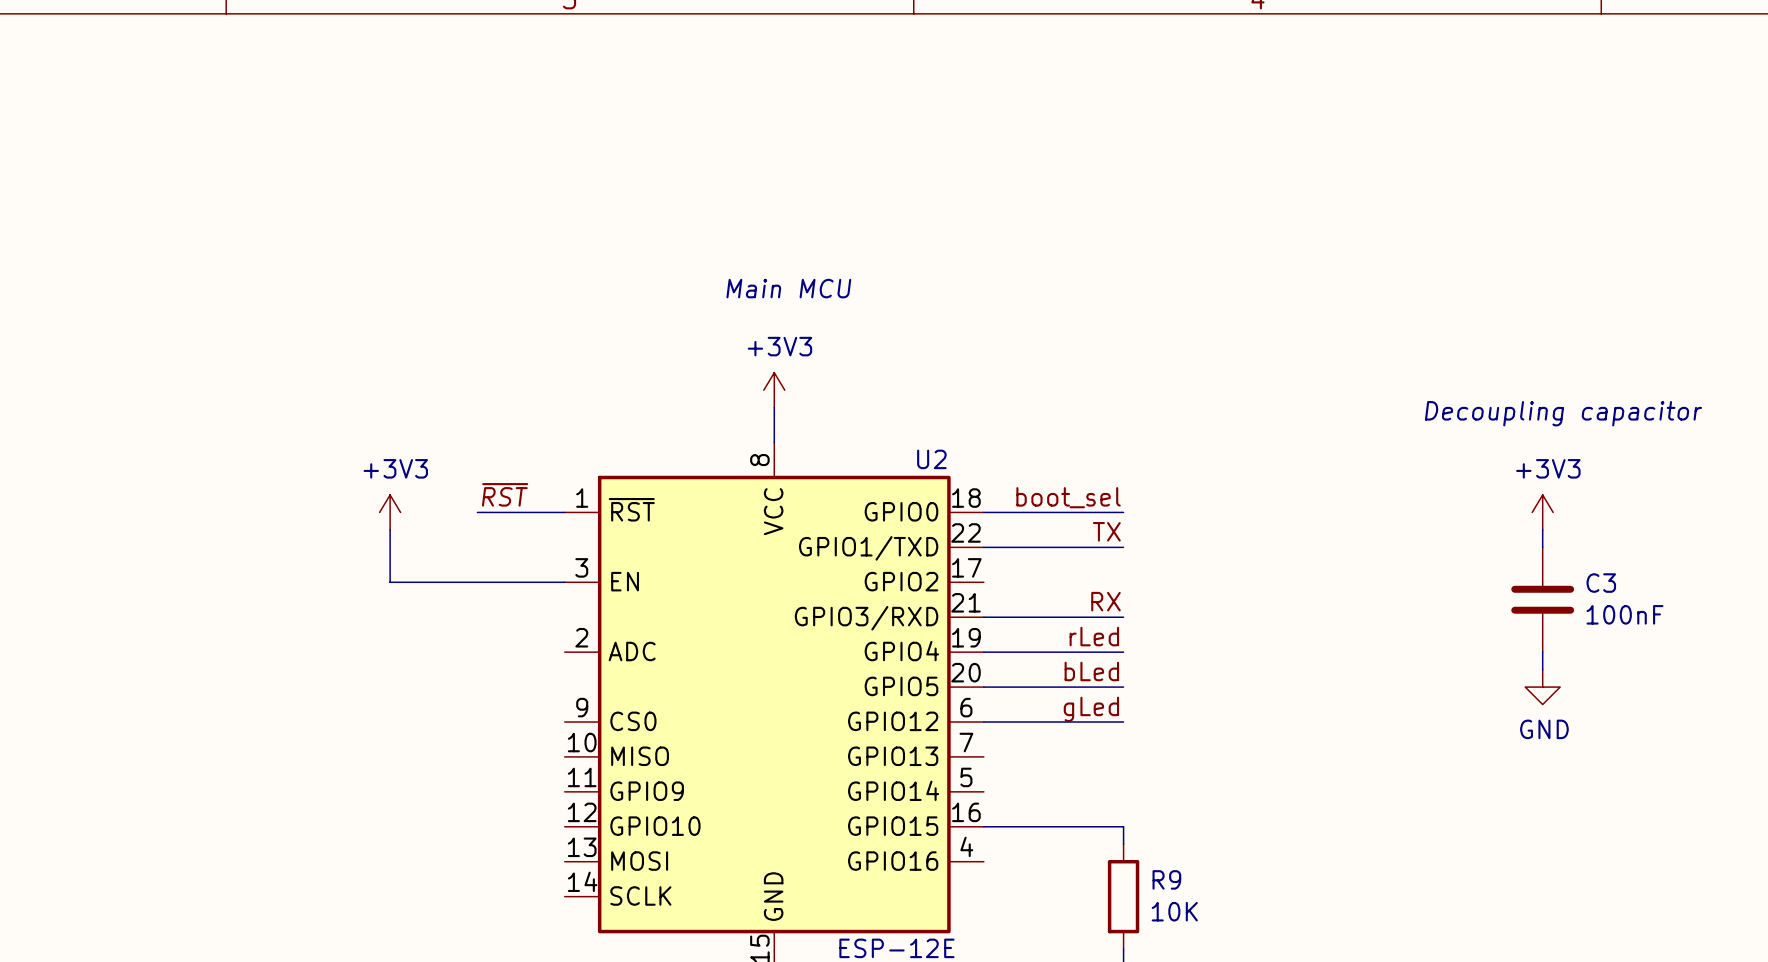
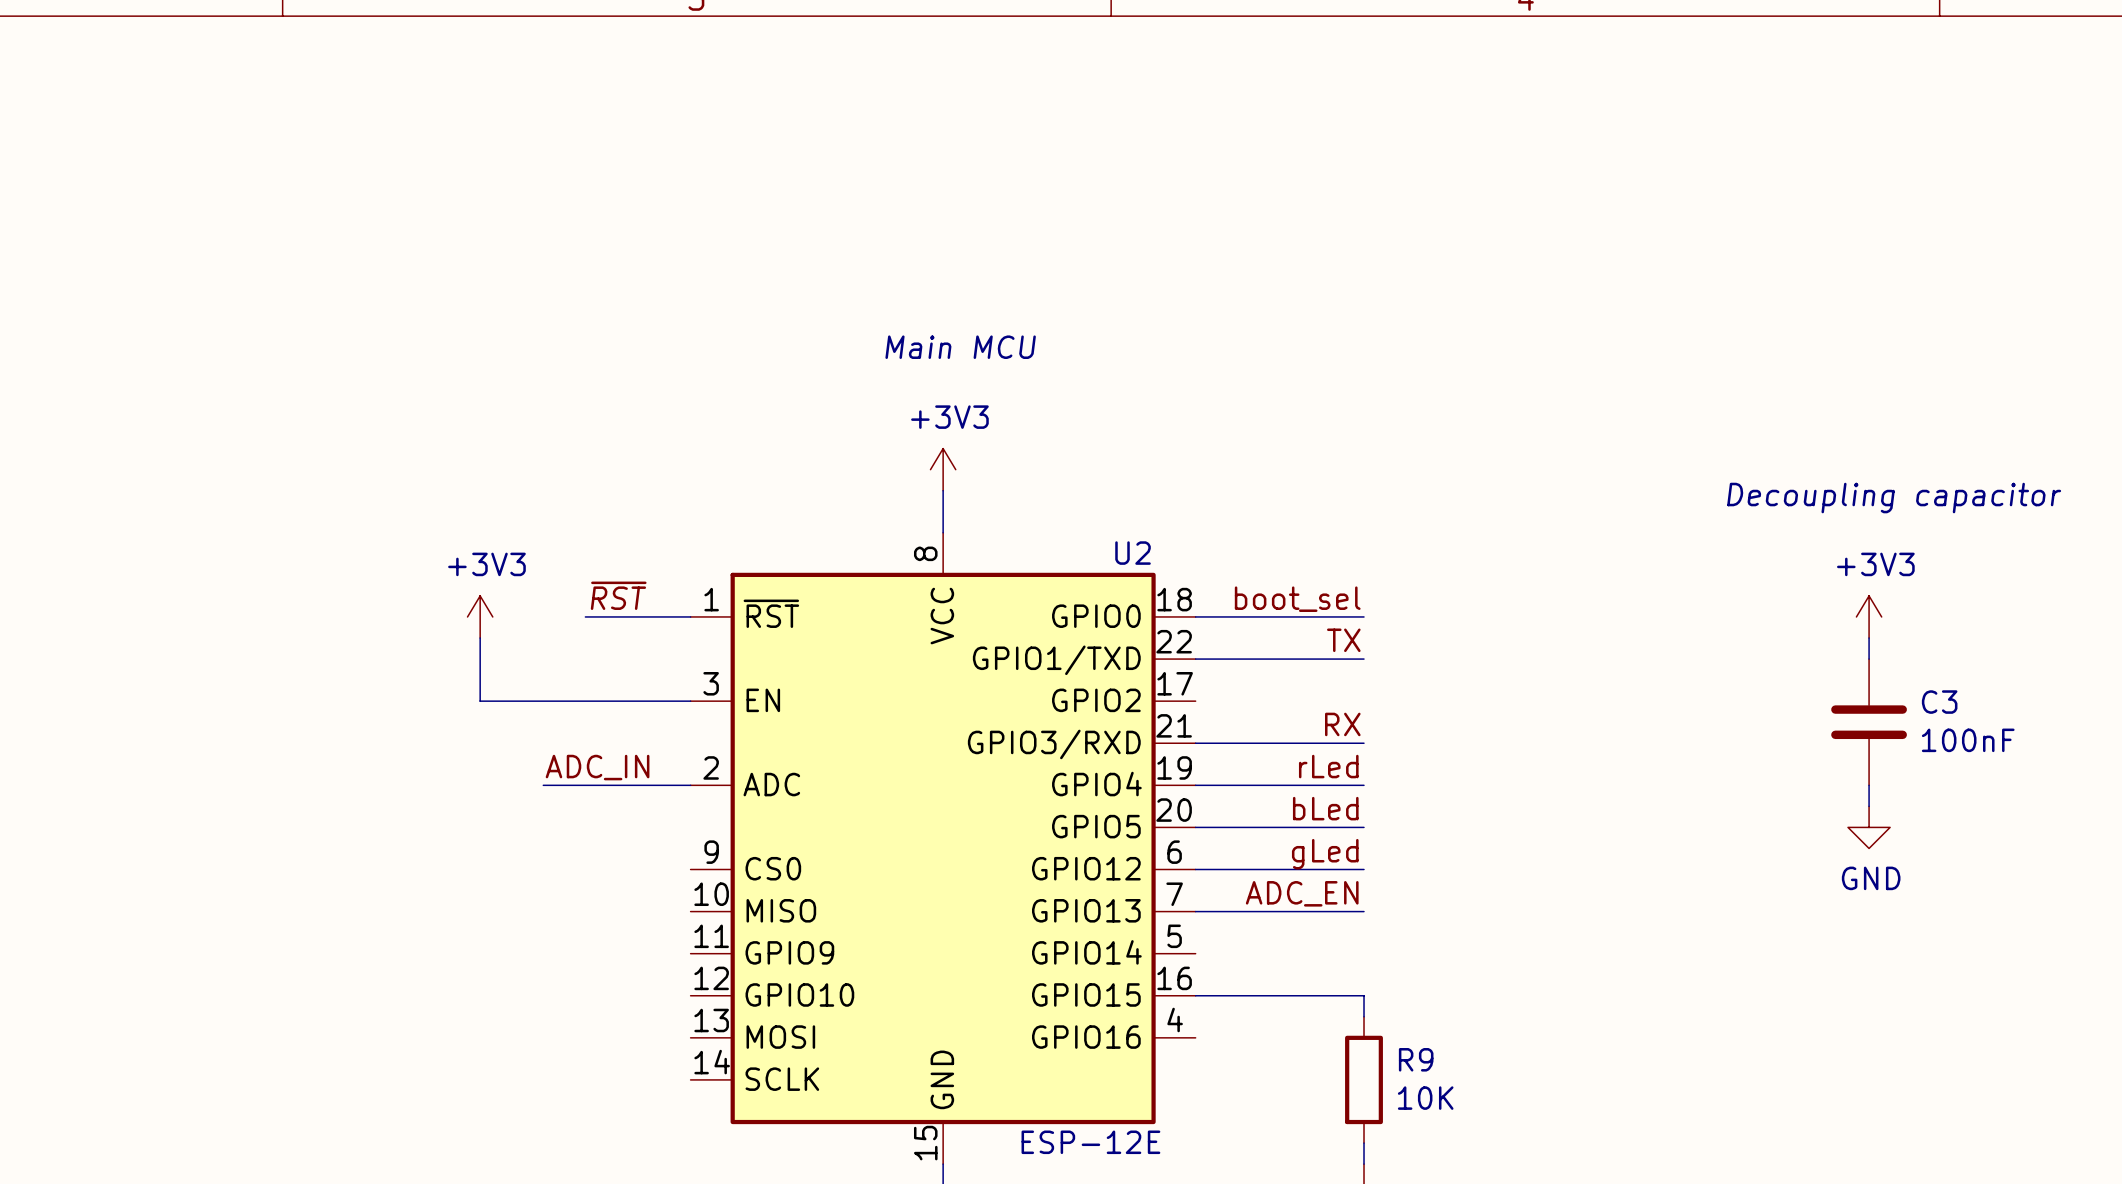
label: none -> ADC_IN (597, 767)
wire: none -> (543, 785) (690, 785)
label: none -> ADC_EN (1302, 893)
wire: none -> (1195, 911) (1364, 911)

